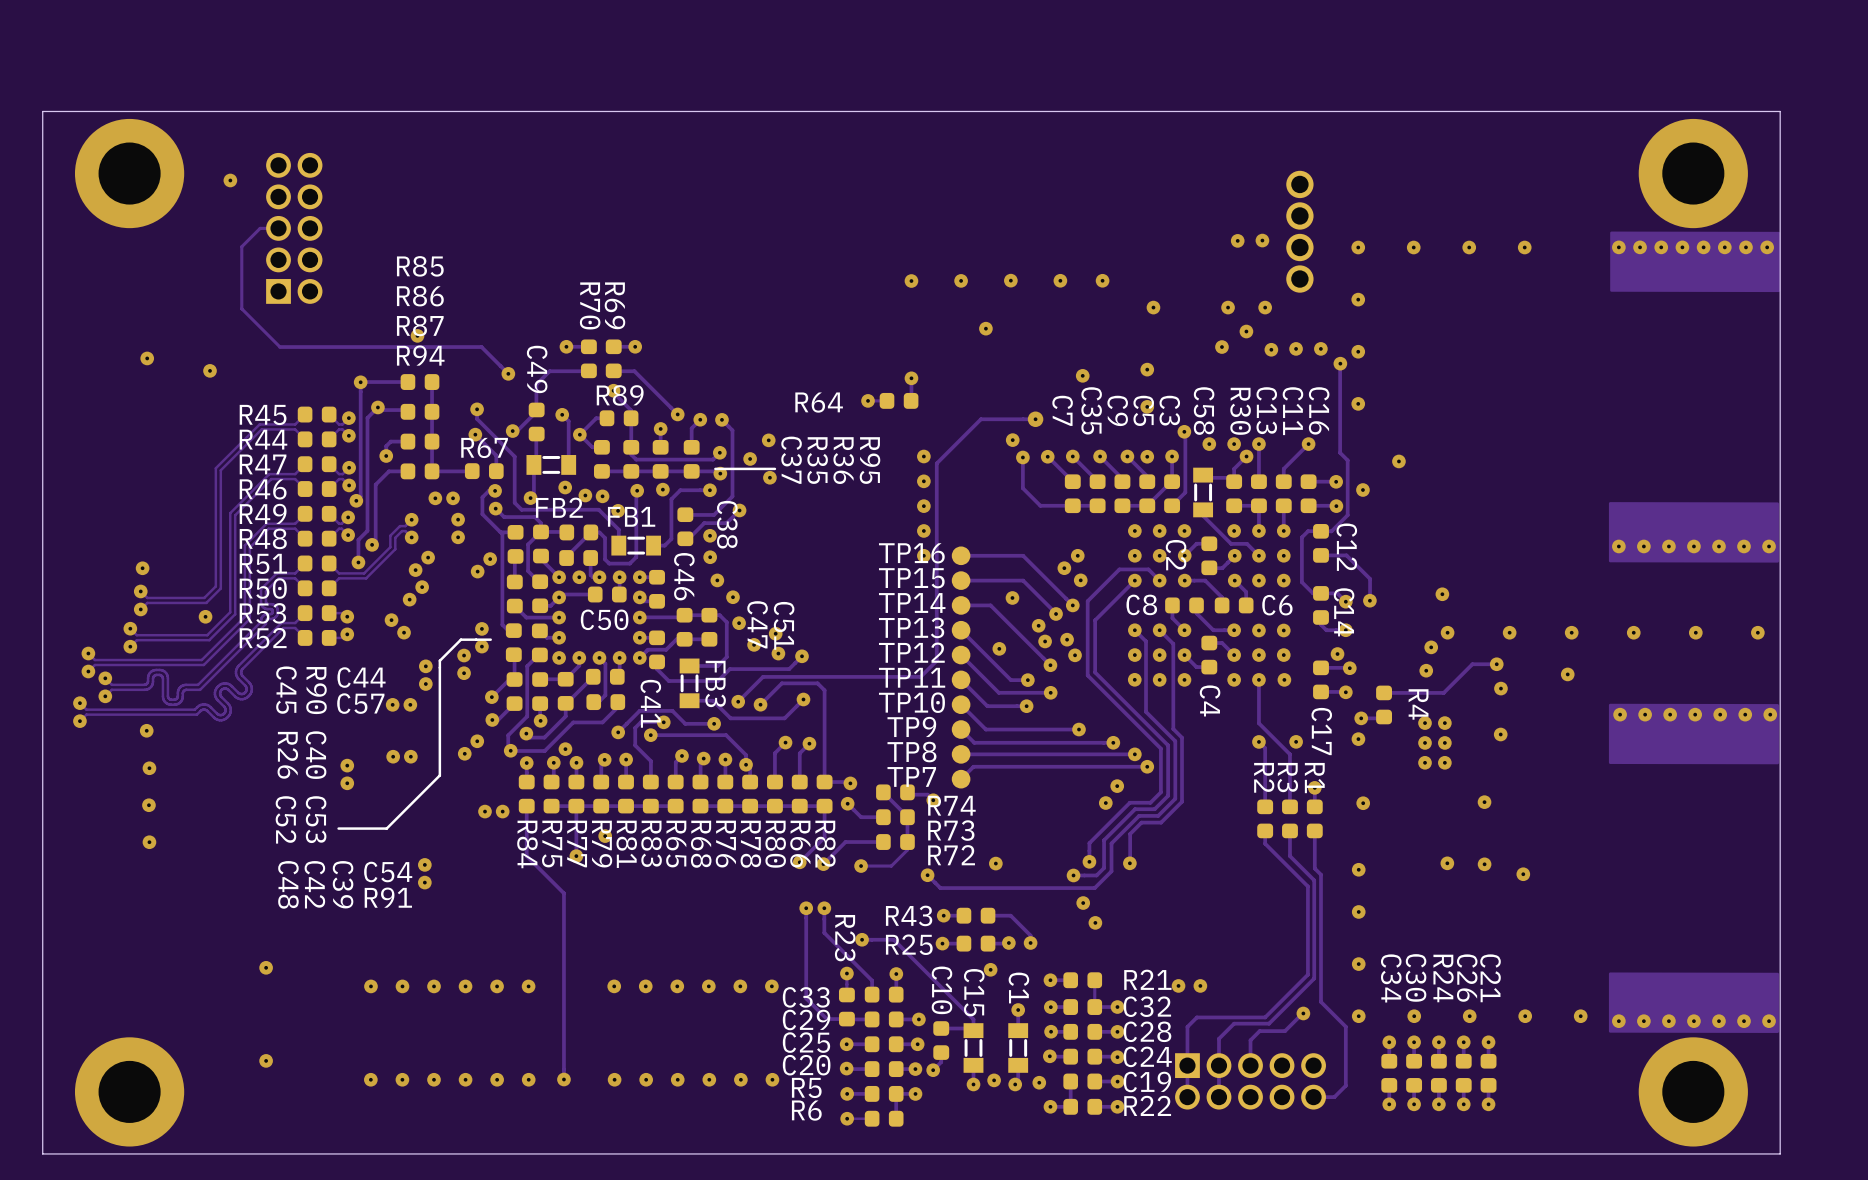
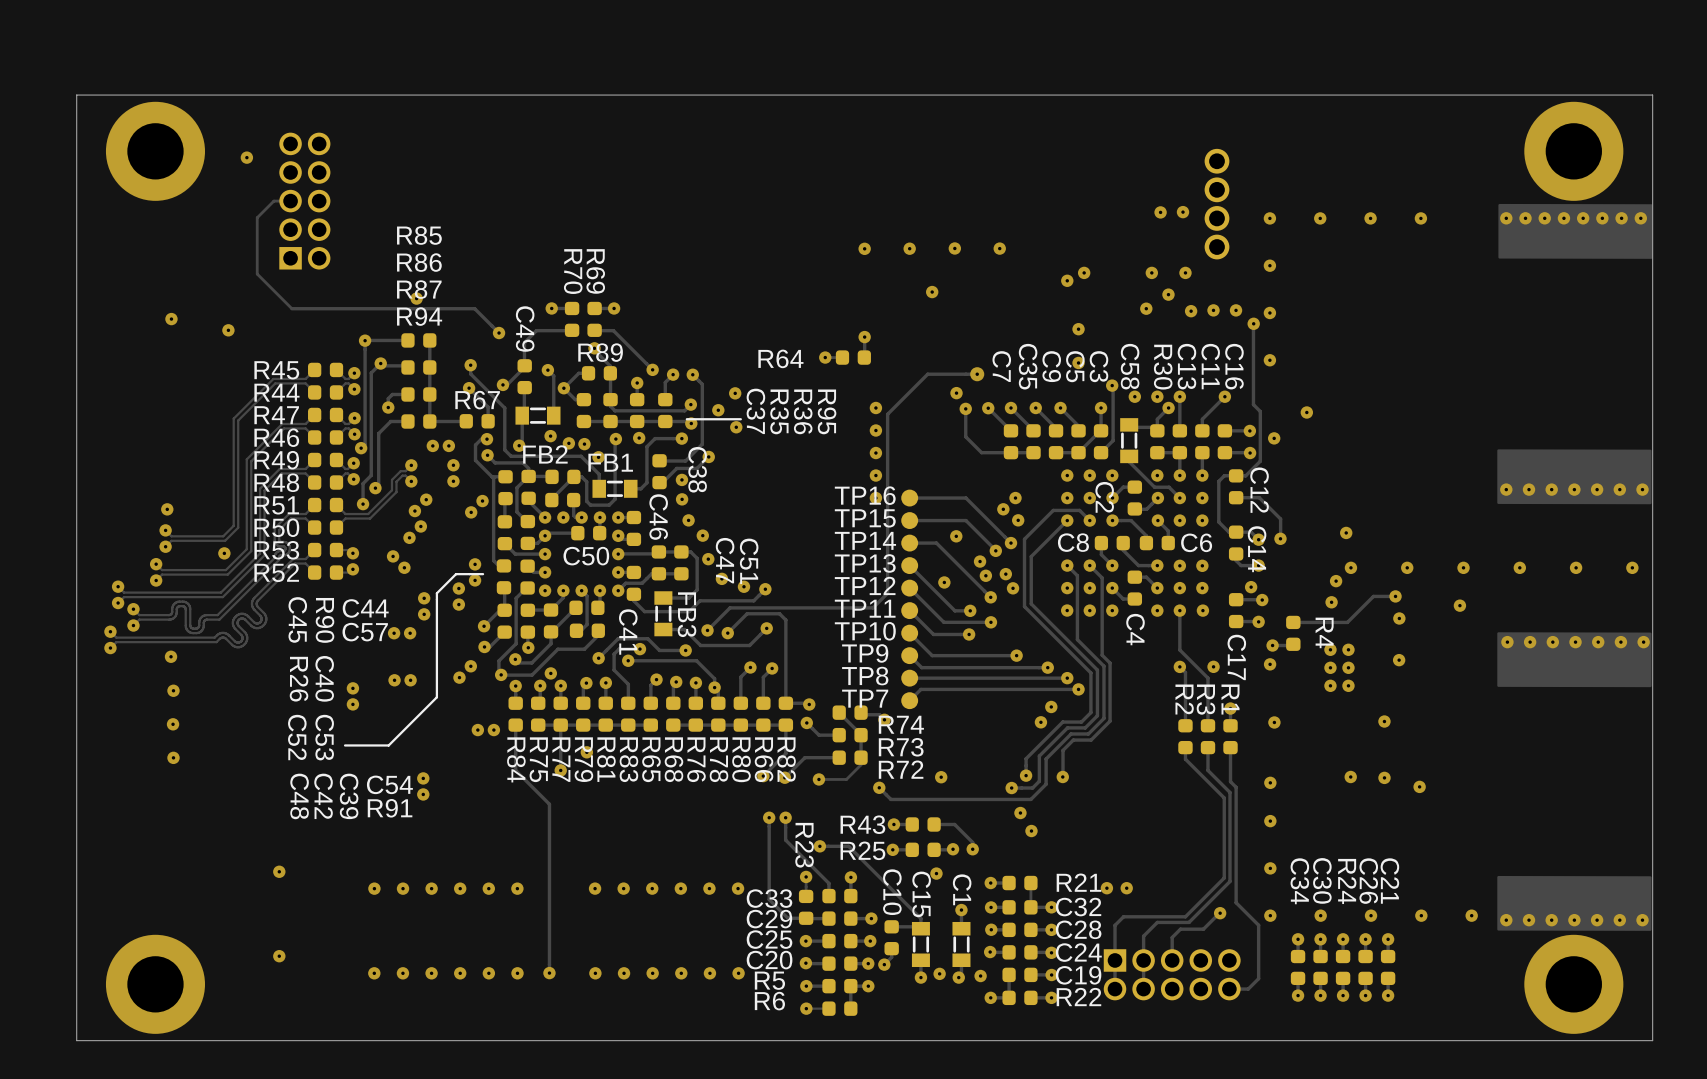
via: (1102, 280) -> none
via: none -> (1067, 280)
via: (1082, 375) -> none
via: (1147, 456) -> none
via: (775, 633) -> none

